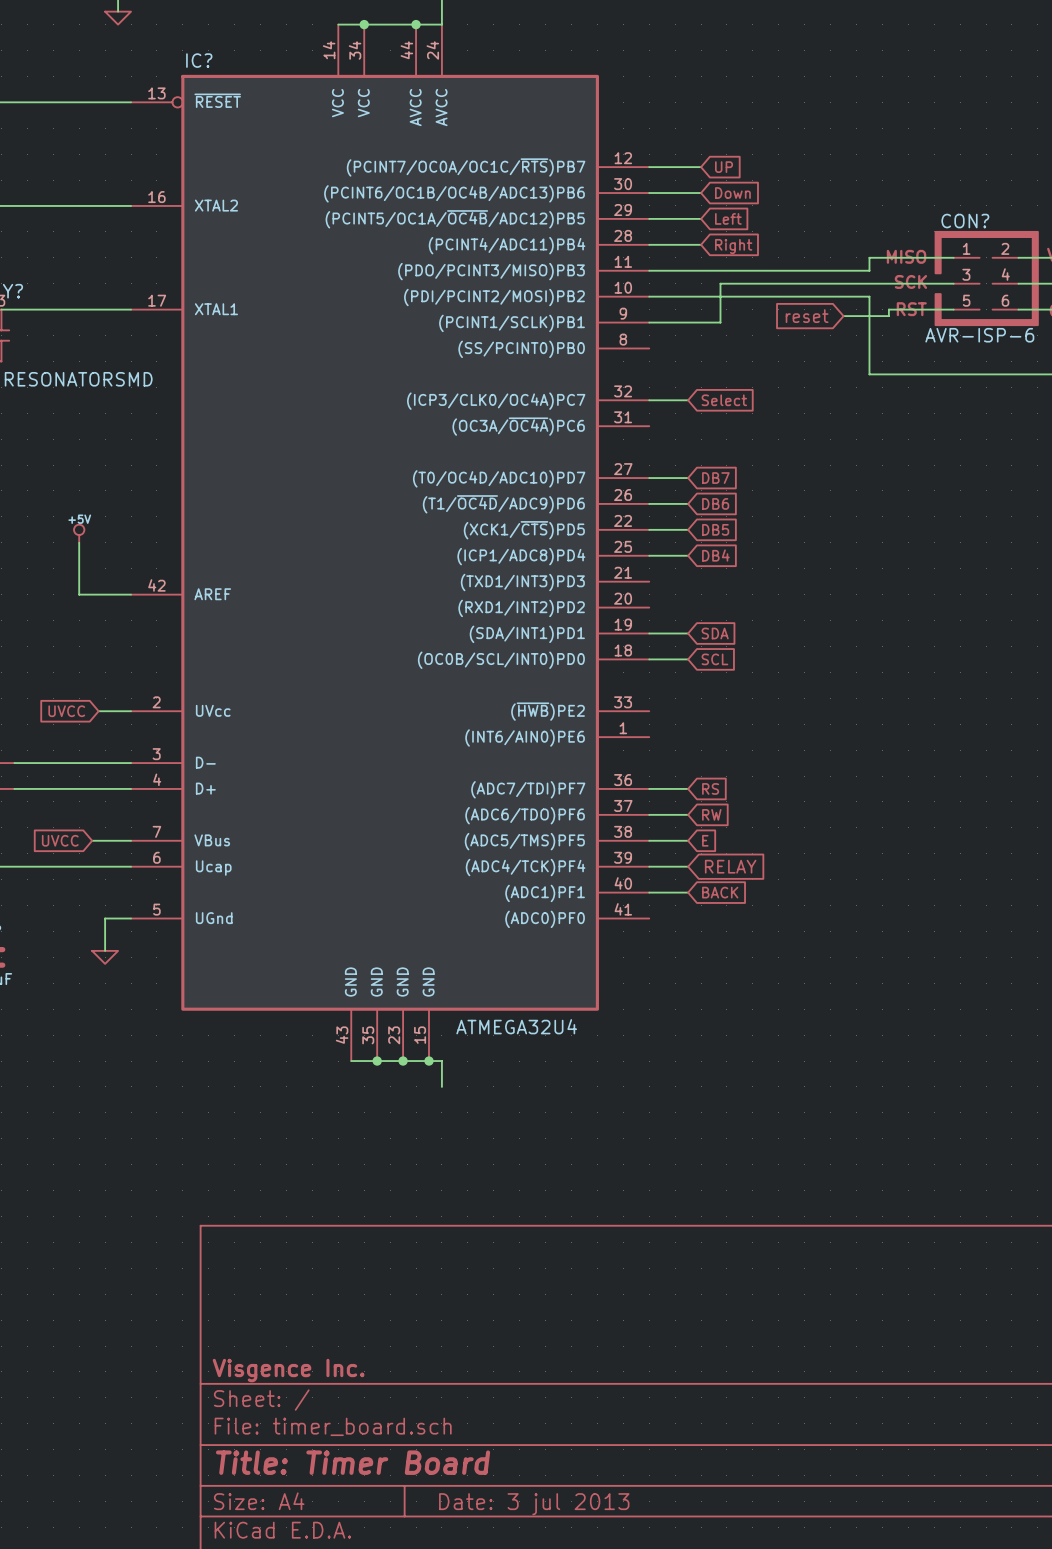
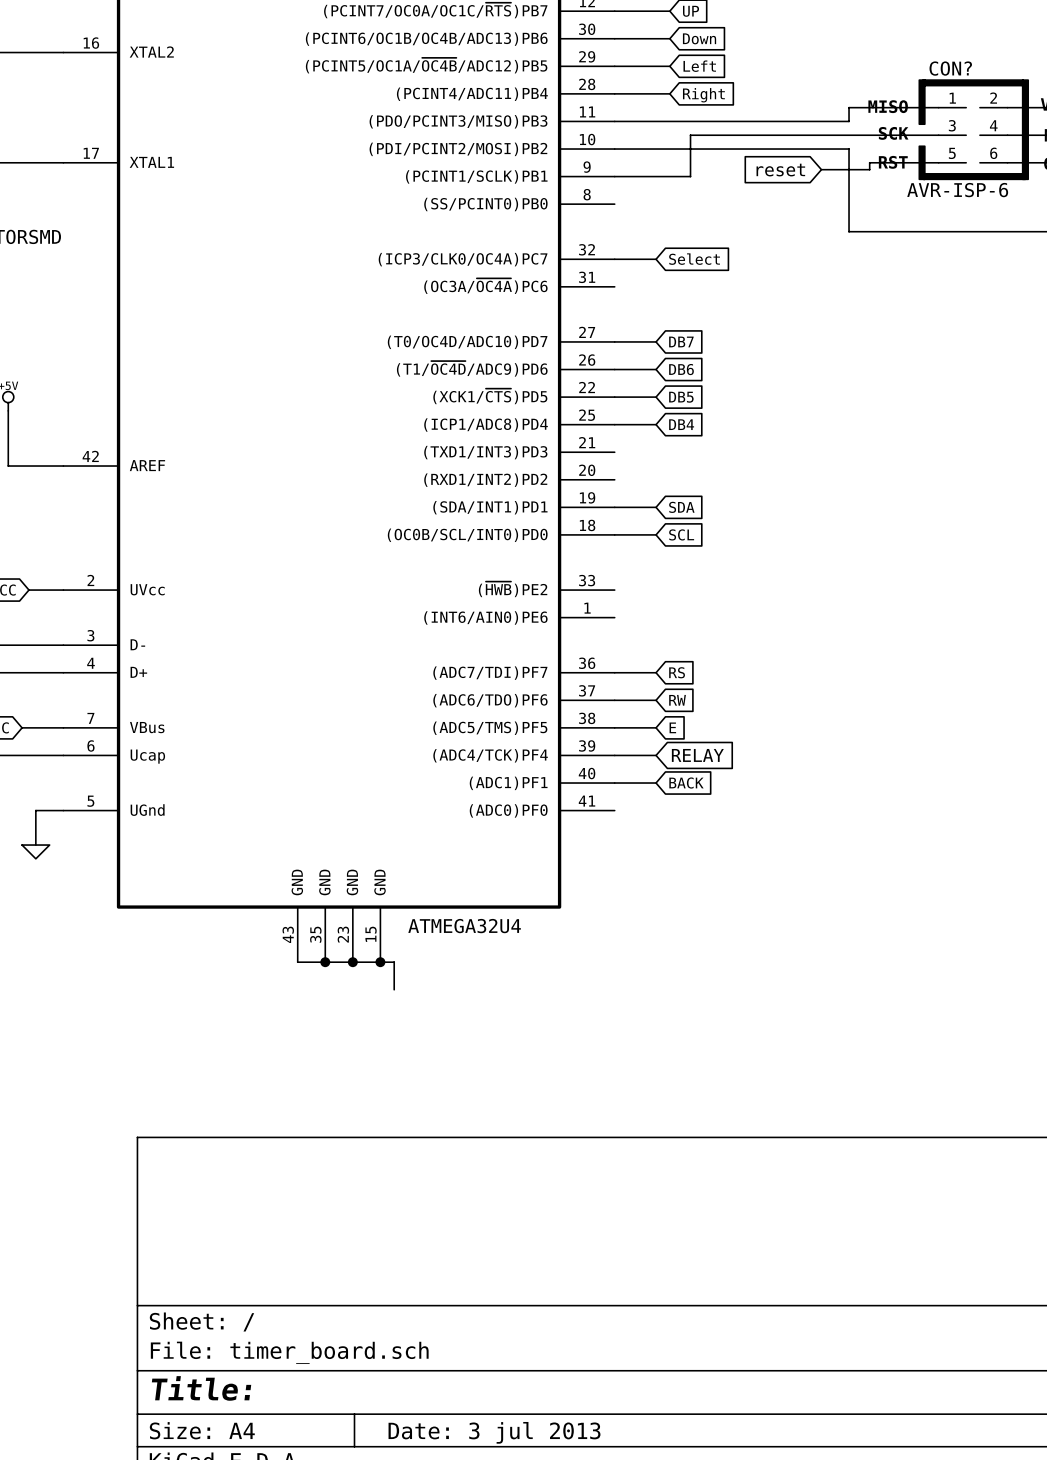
title block: Visgence Inc. (288, 1370) -> none
title block: Title: Timer Board (353, 1462) -> Title: (201, 1388)

